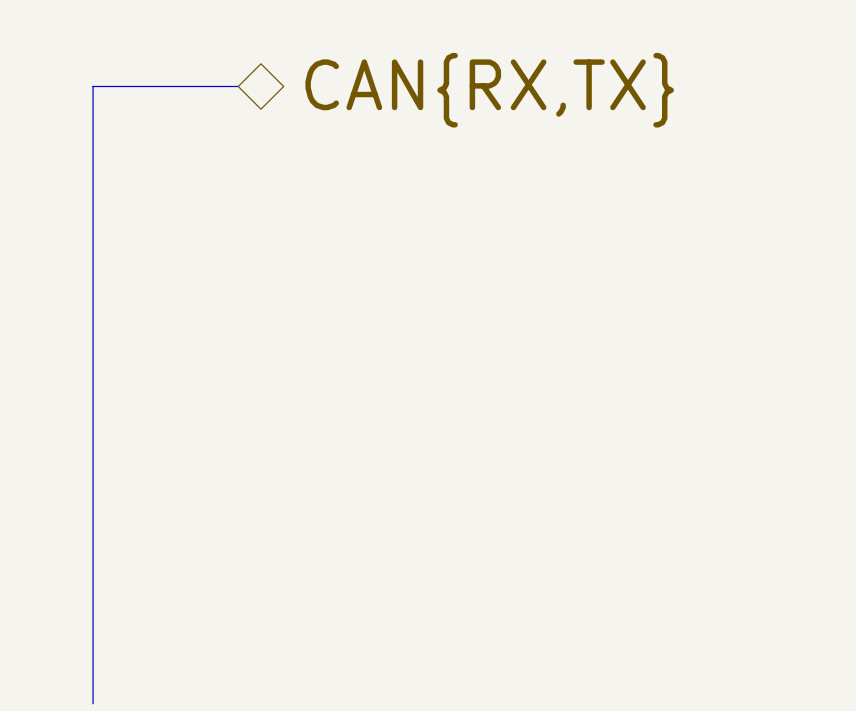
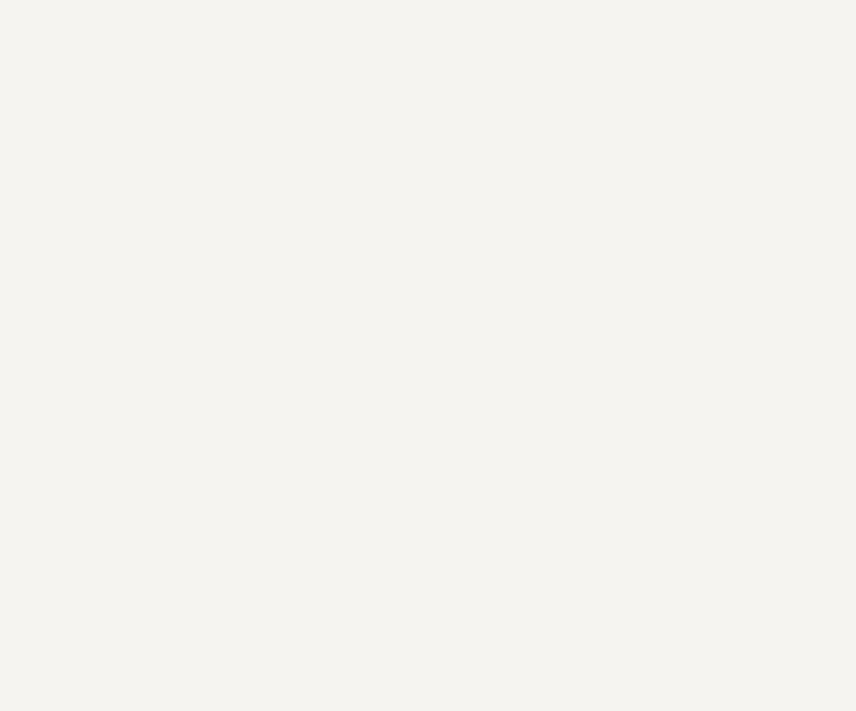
bus: (238, 86) (93, 86) (93, 703) -> none
hierarchical label: CAN{RX,TX} (489, 90) -> none

